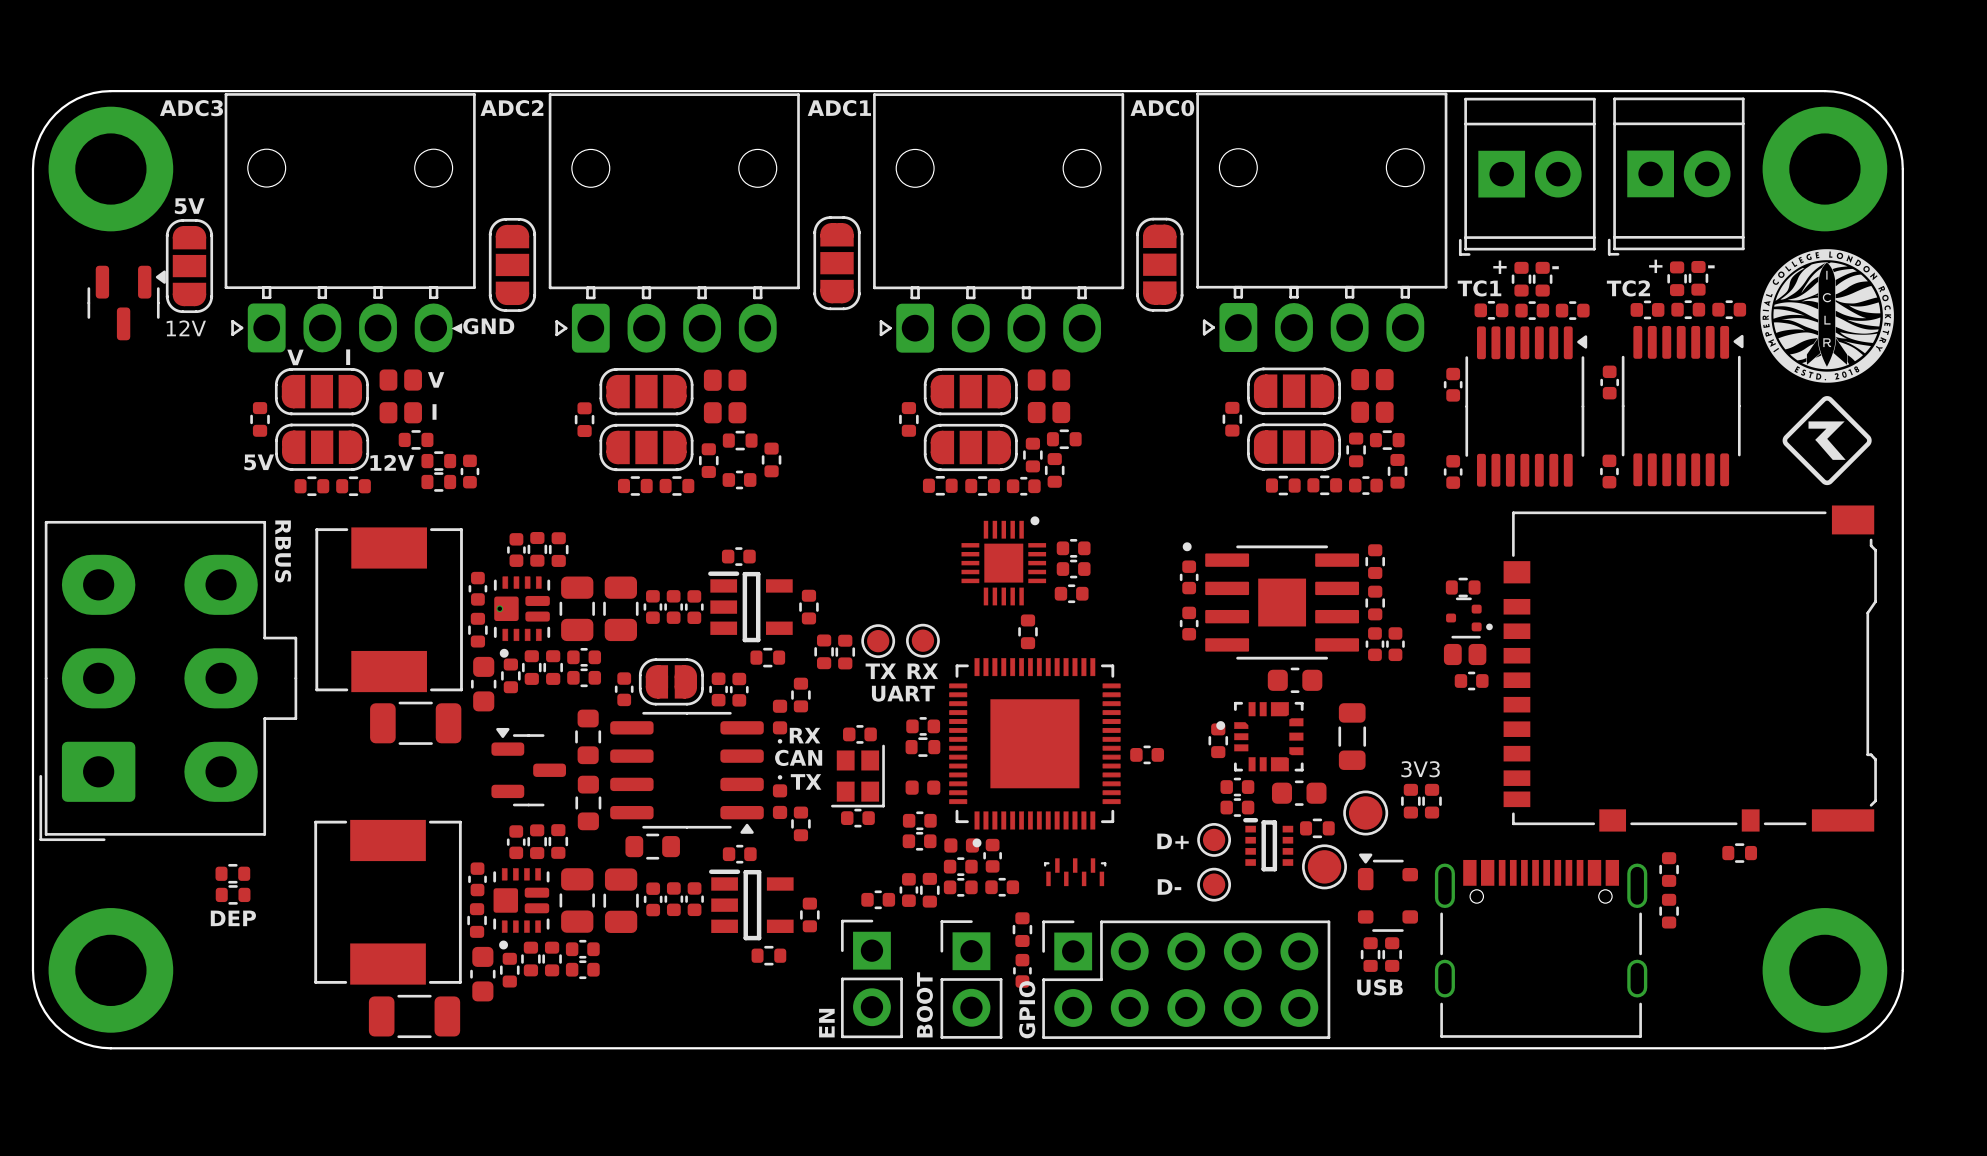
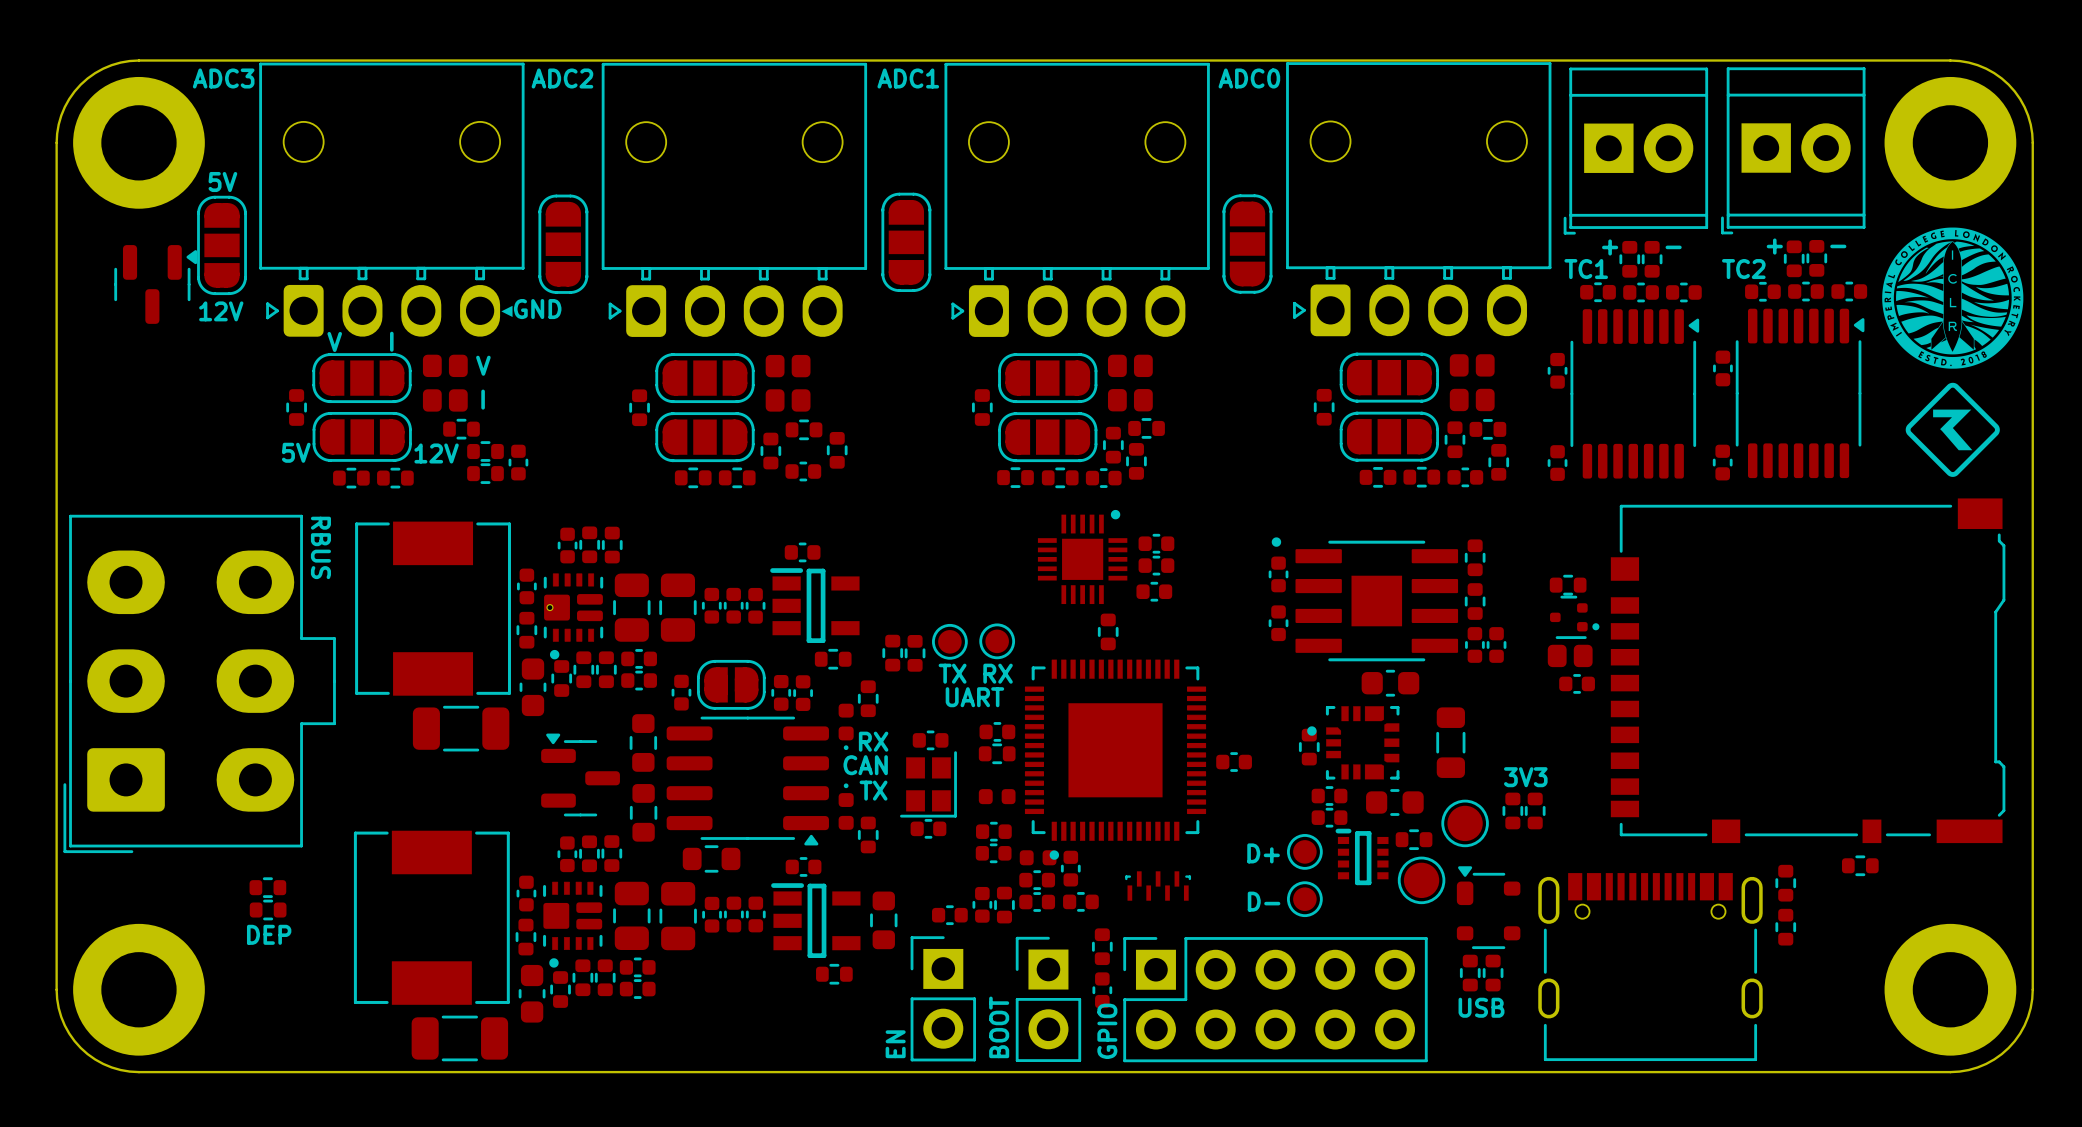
part: (808, 607) -> none
part footprint: [800, 897, 820, 933] -> [870, 891, 898, 950]

